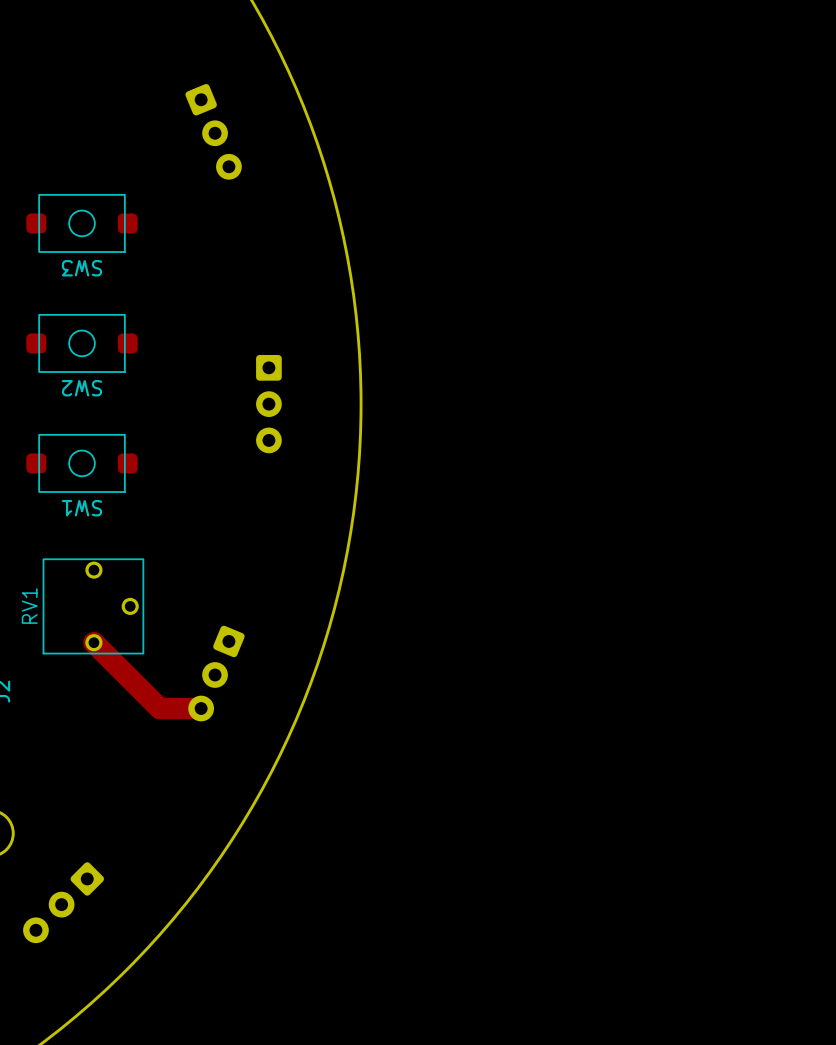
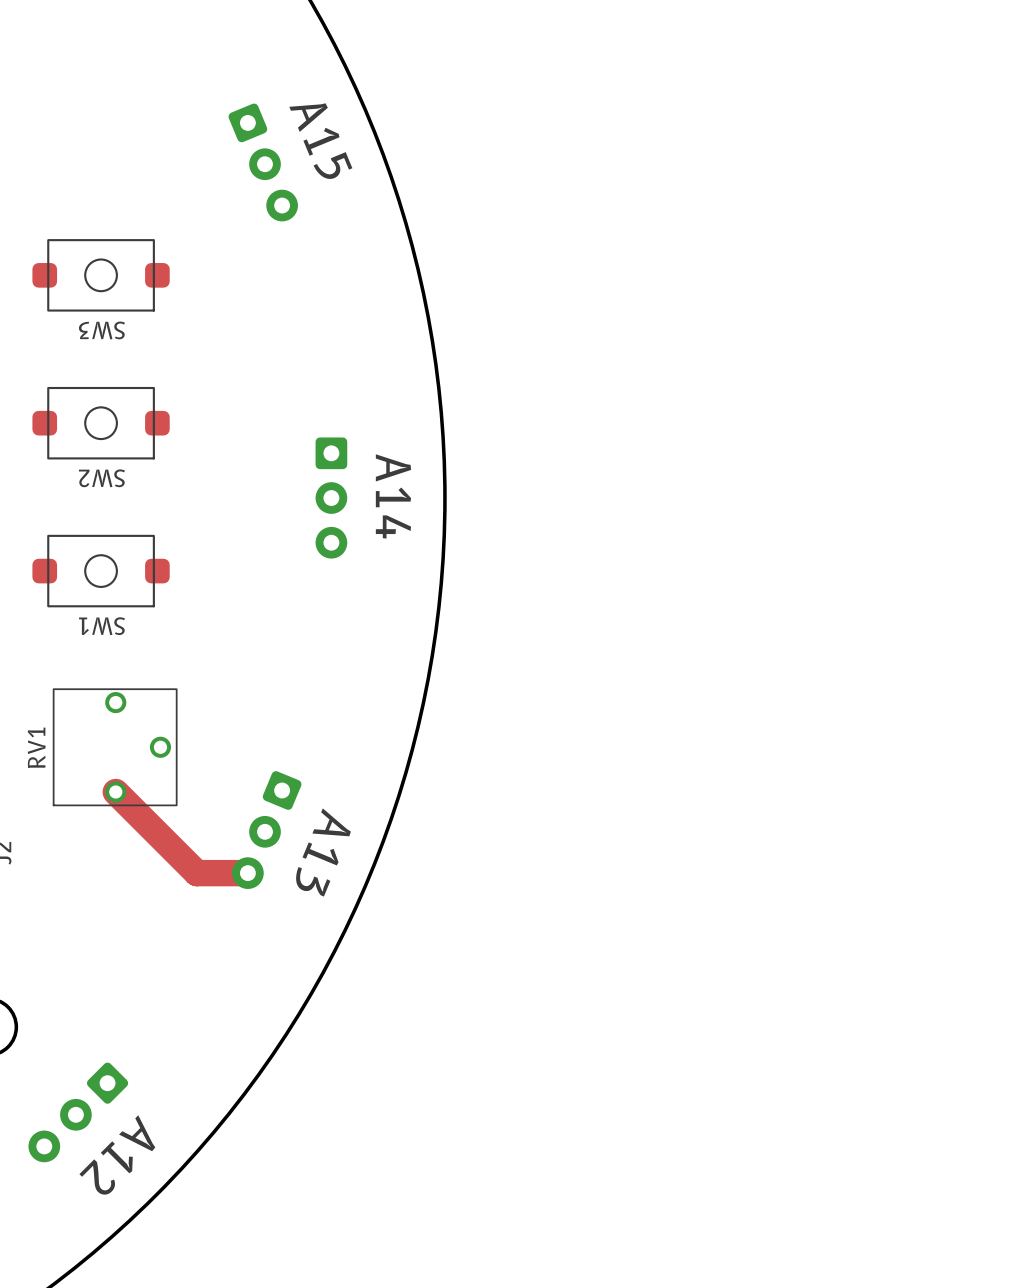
text: none -> A15 (320, 141)
text: none -> A14 (393, 496)
text: none -> A13 (323, 852)
text: none -> A12 (117, 1154)

